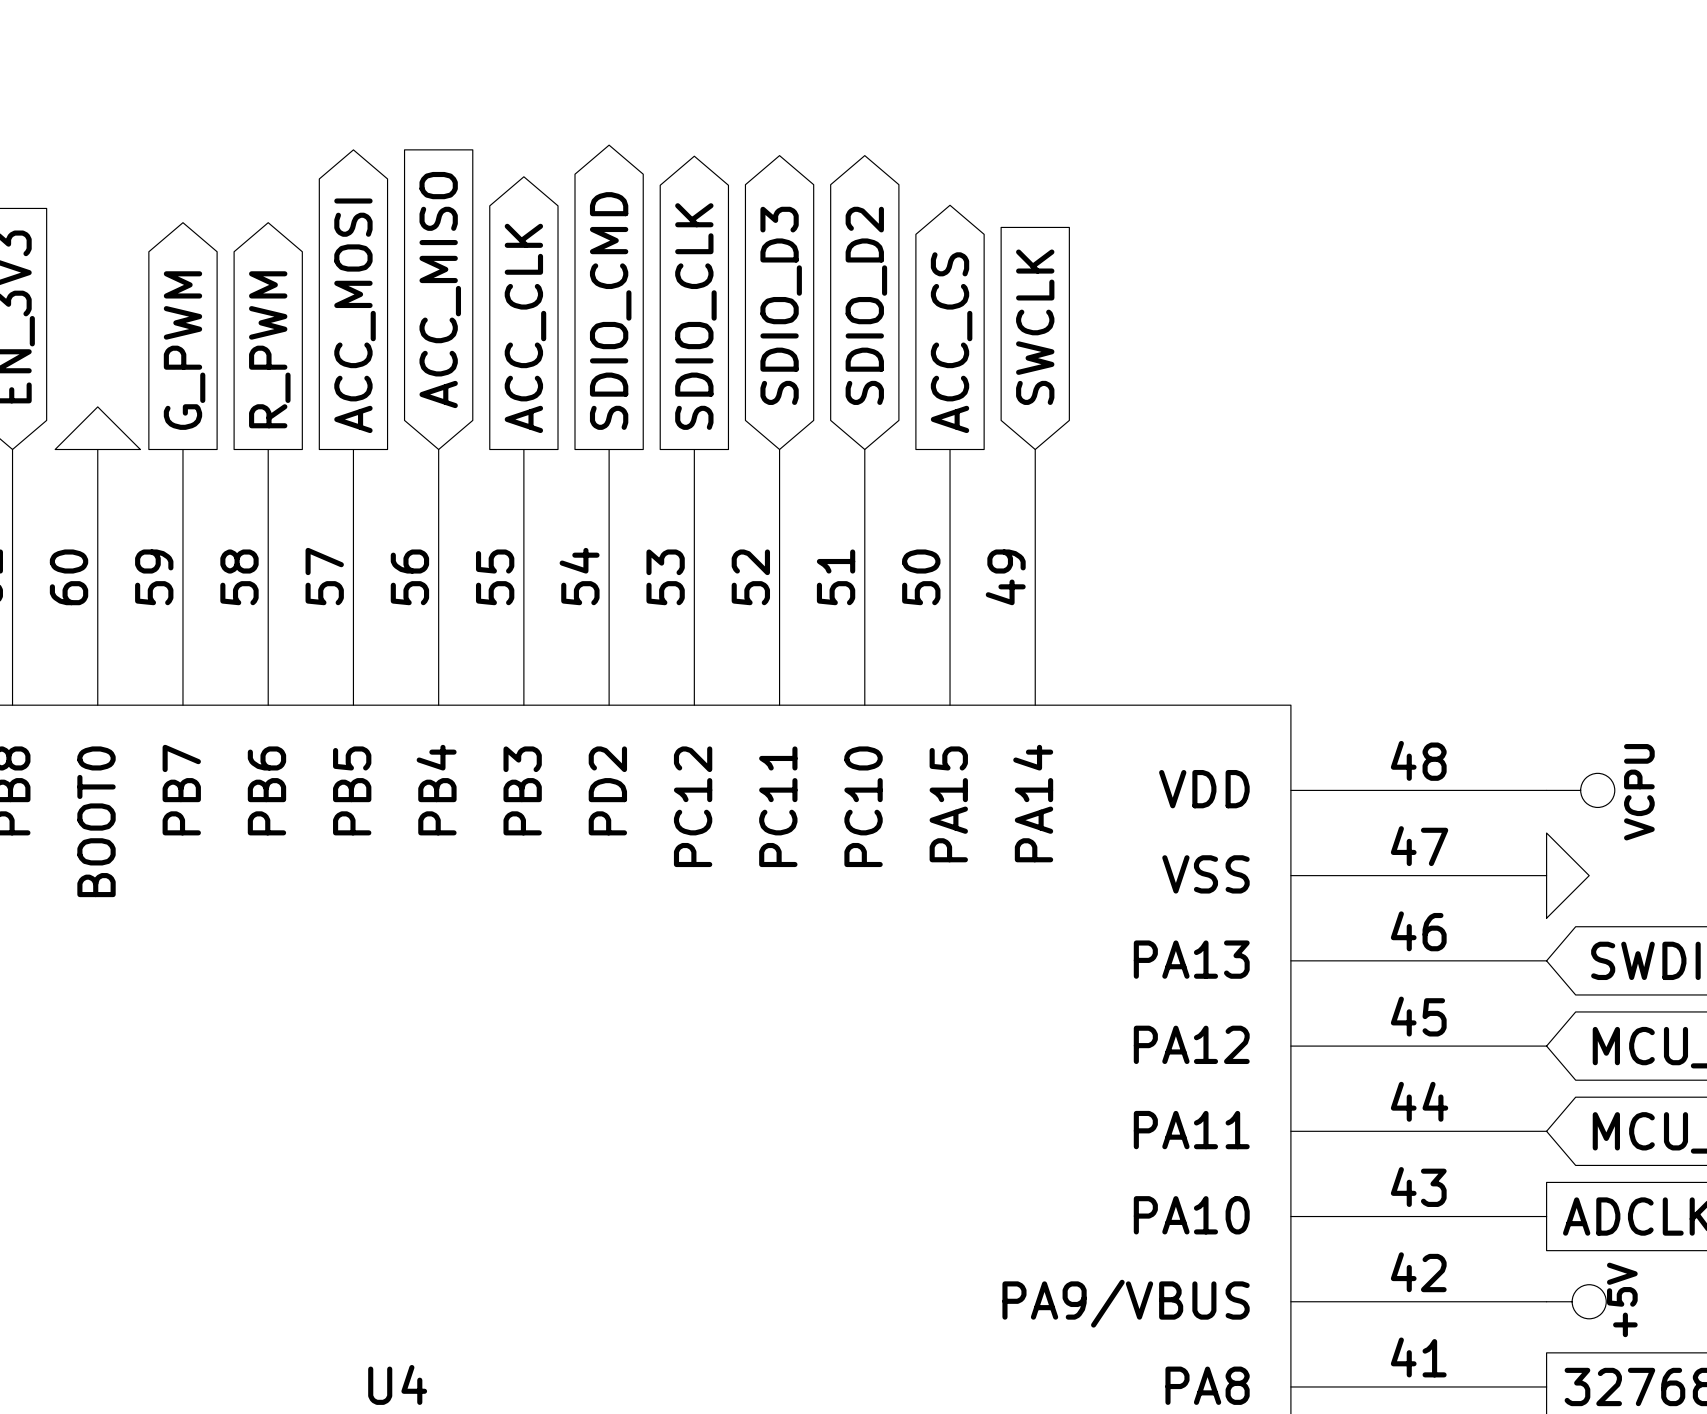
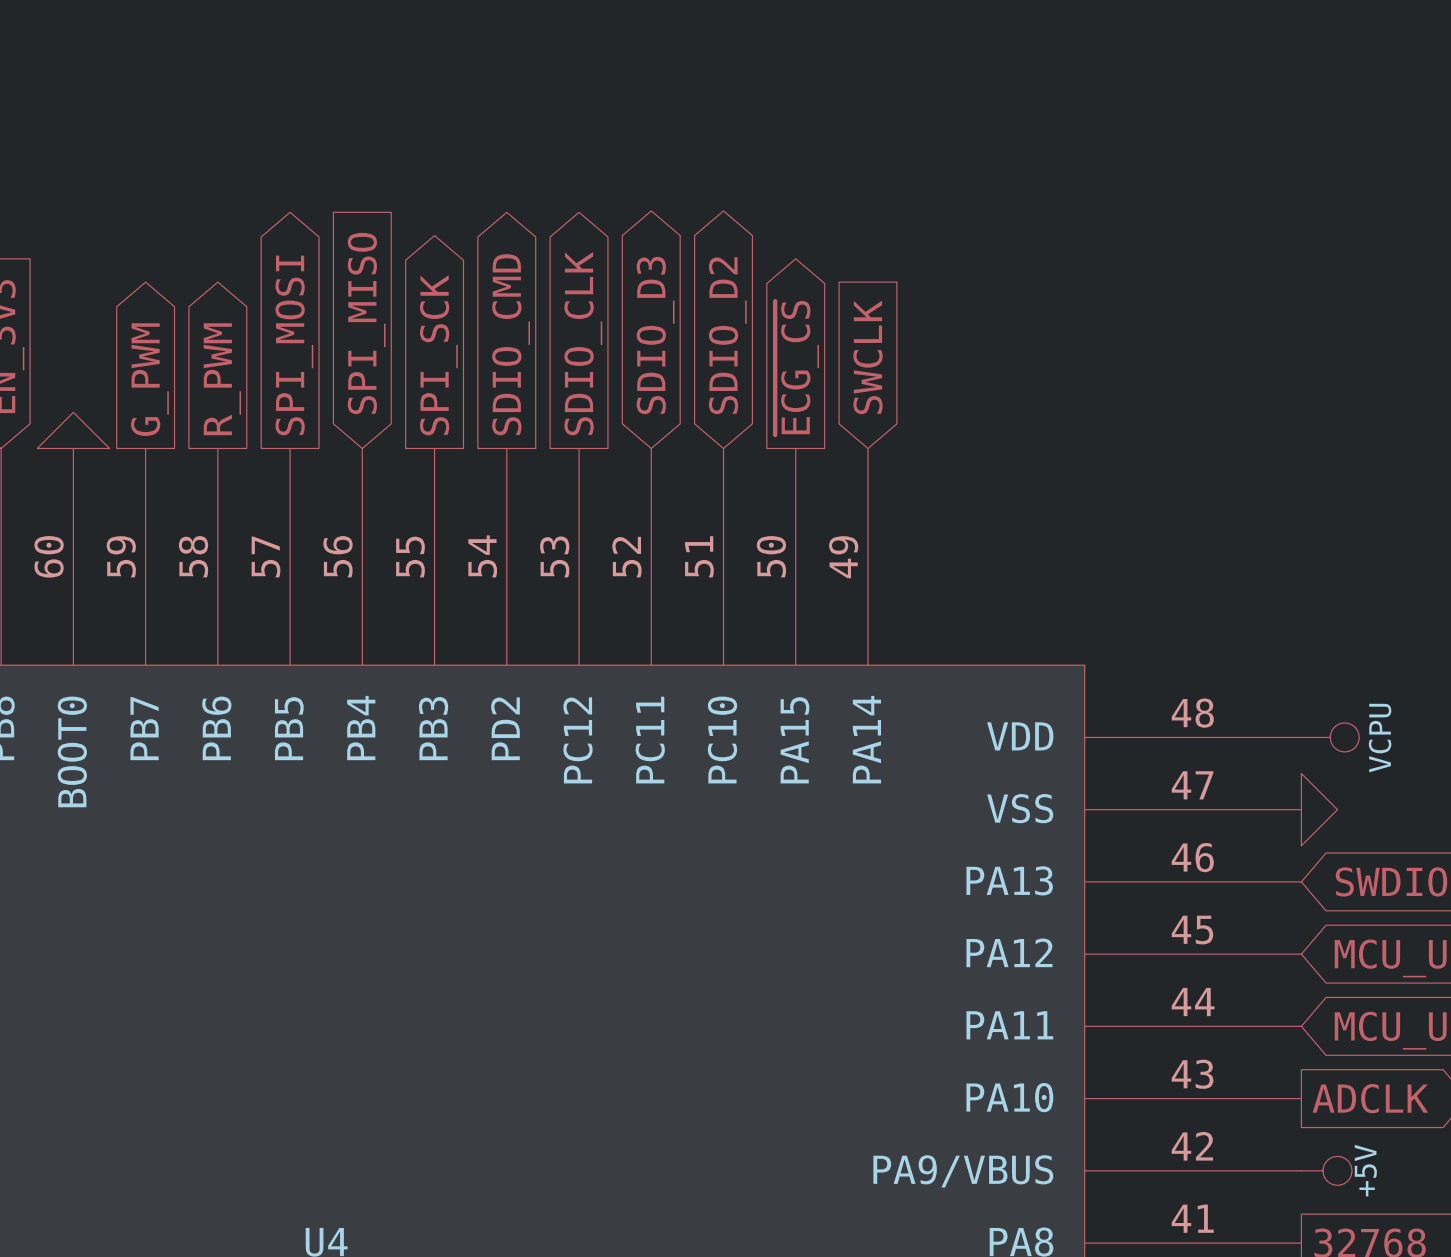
global label: ACC_MISO (440, 290) -> SPI_MISO (366, 323)
global label: ACC_MOSI (355, 315) -> SPI_MOSI (294, 345)
global label: ACC_CLK (525, 328) -> SPI_SCK (438, 355)
global label: ACC_CS (951, 342) -> ~{ECG_CS} (797, 367)

